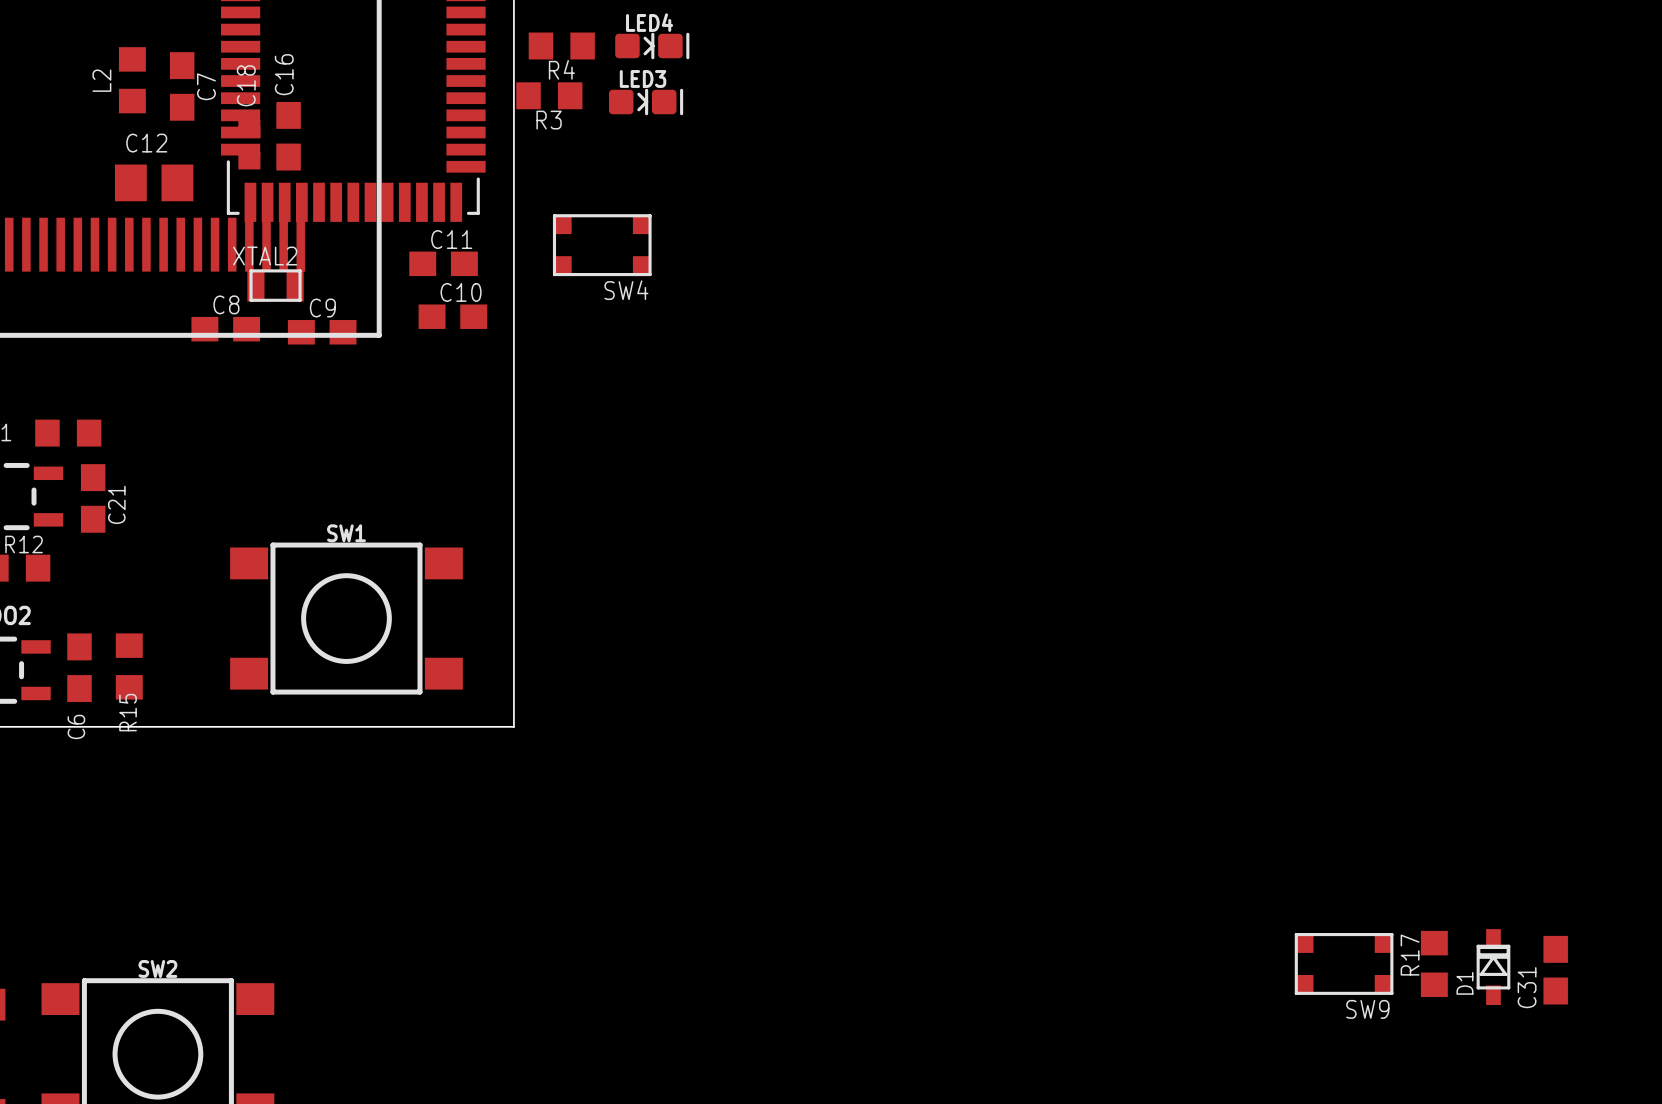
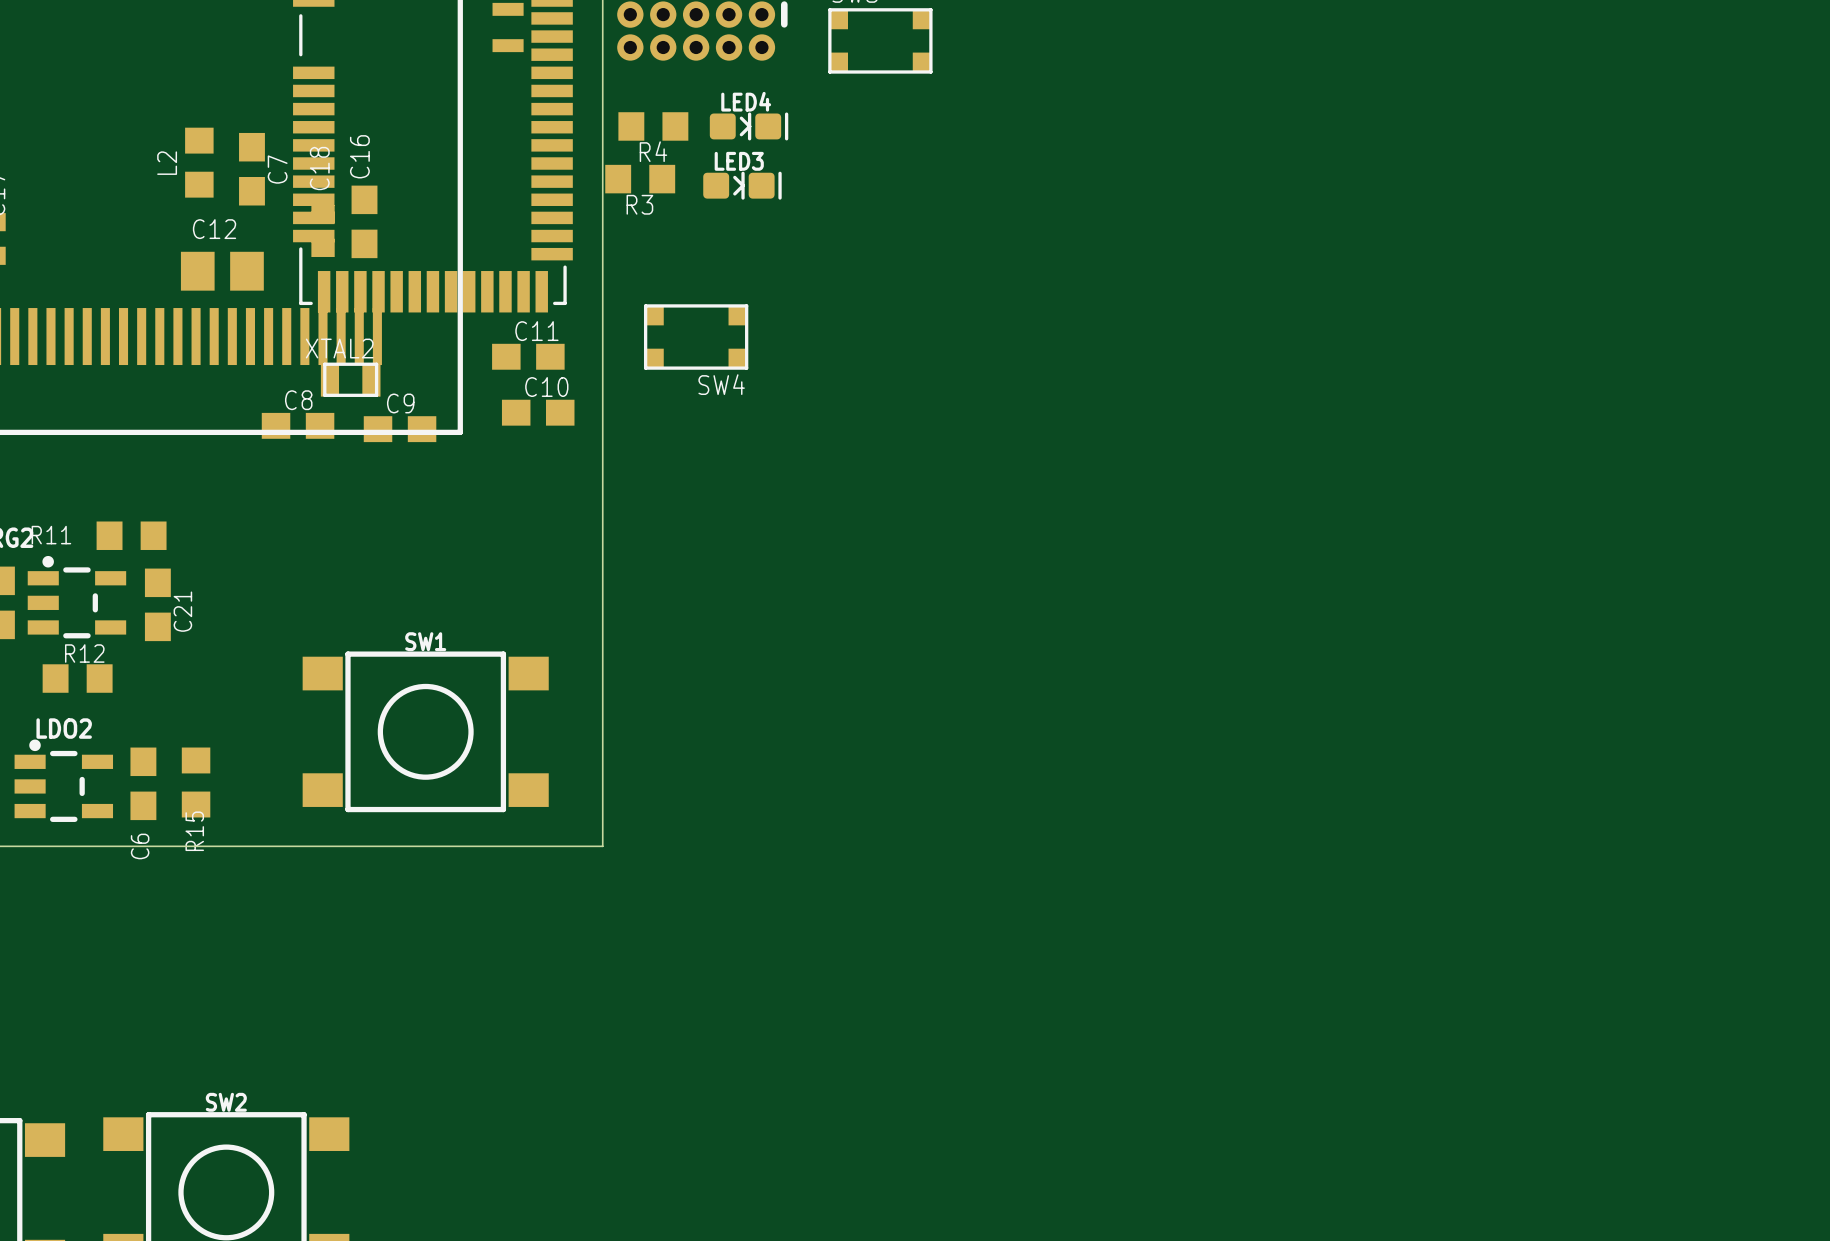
SW9: (1344, 963) -> none
R17: (1434, 963) -> none
D1: (1493, 967) -> none
C31: (1555, 970) -> none

